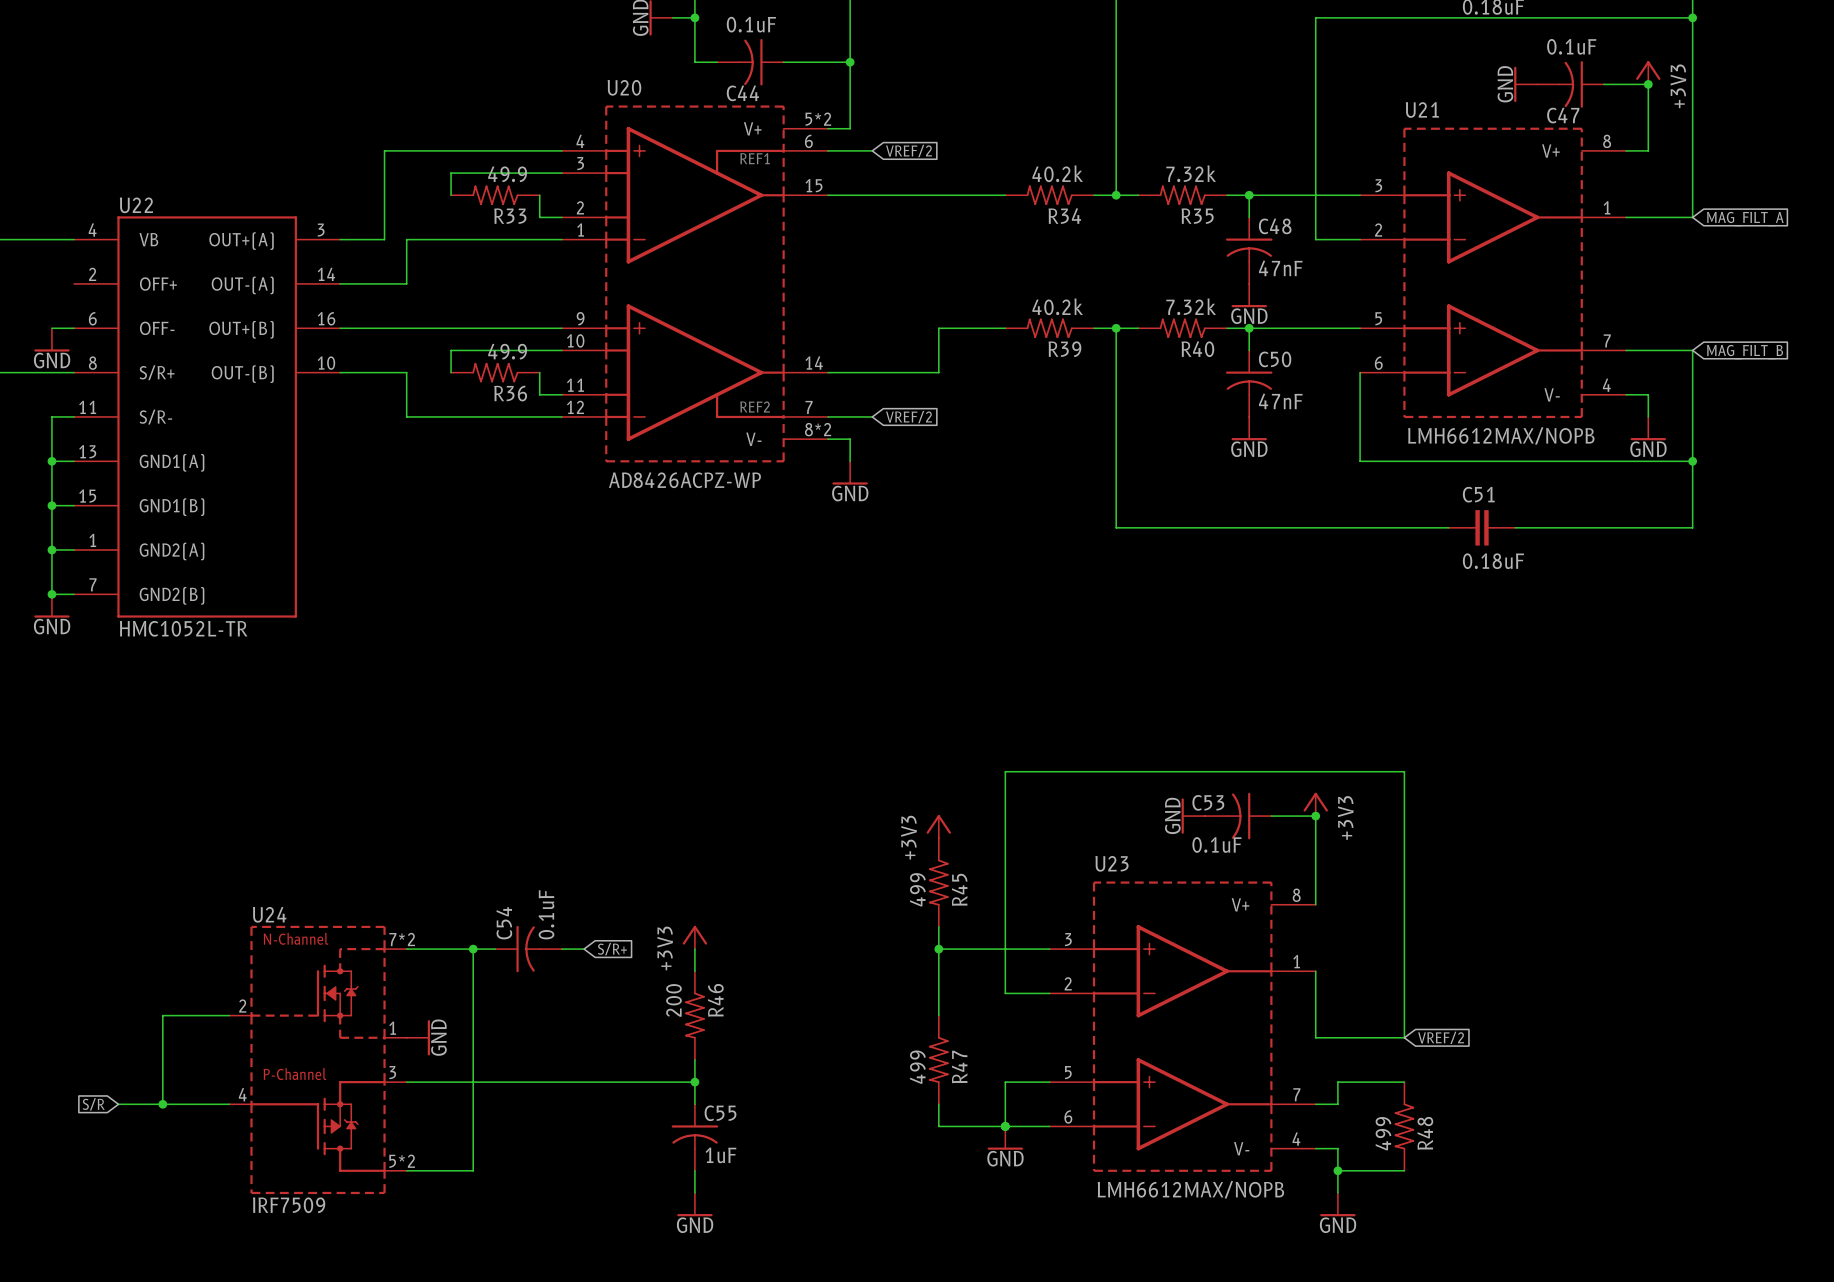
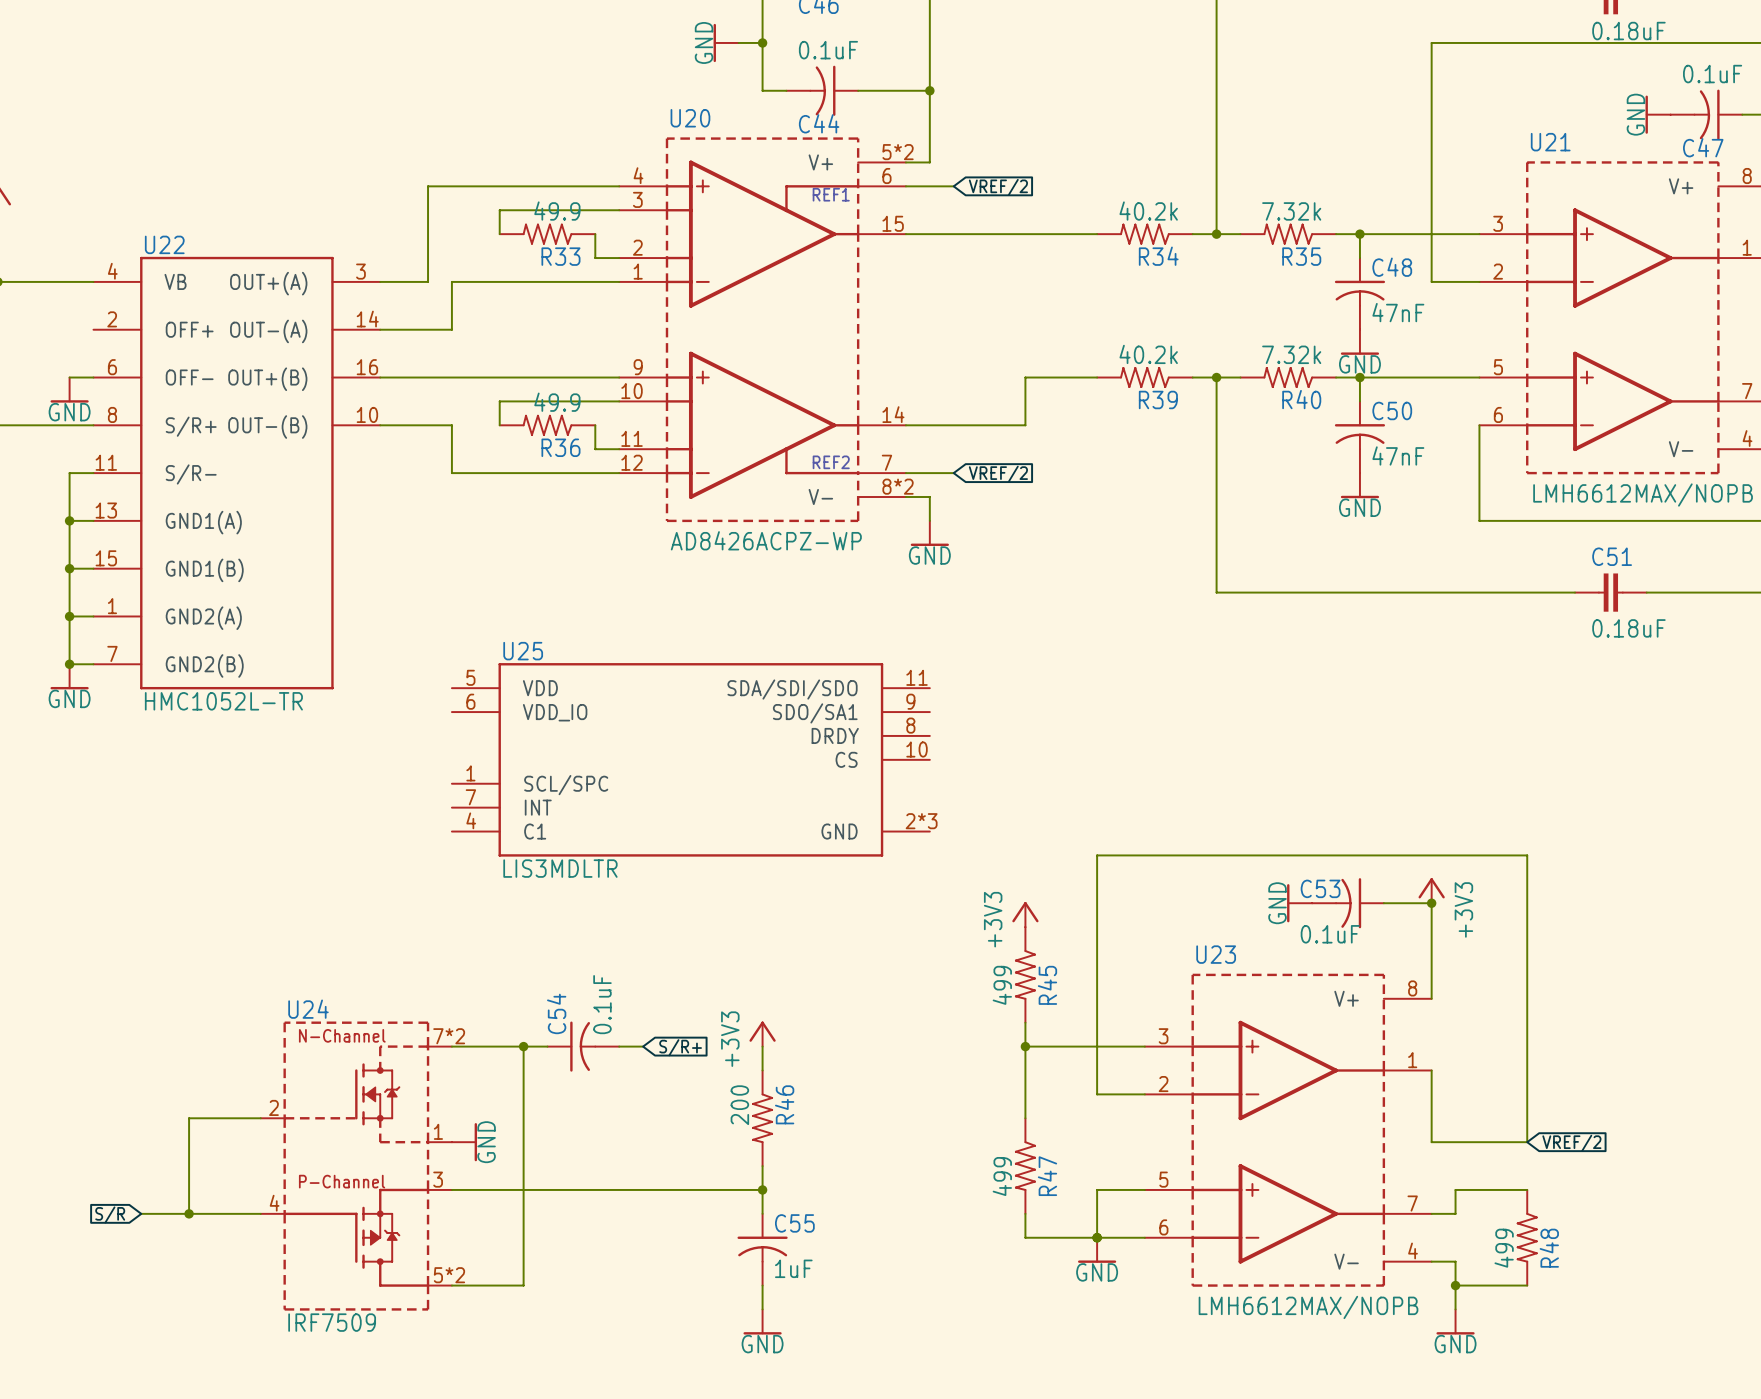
U25: none -> LIS3MDLTR (690, 759)

